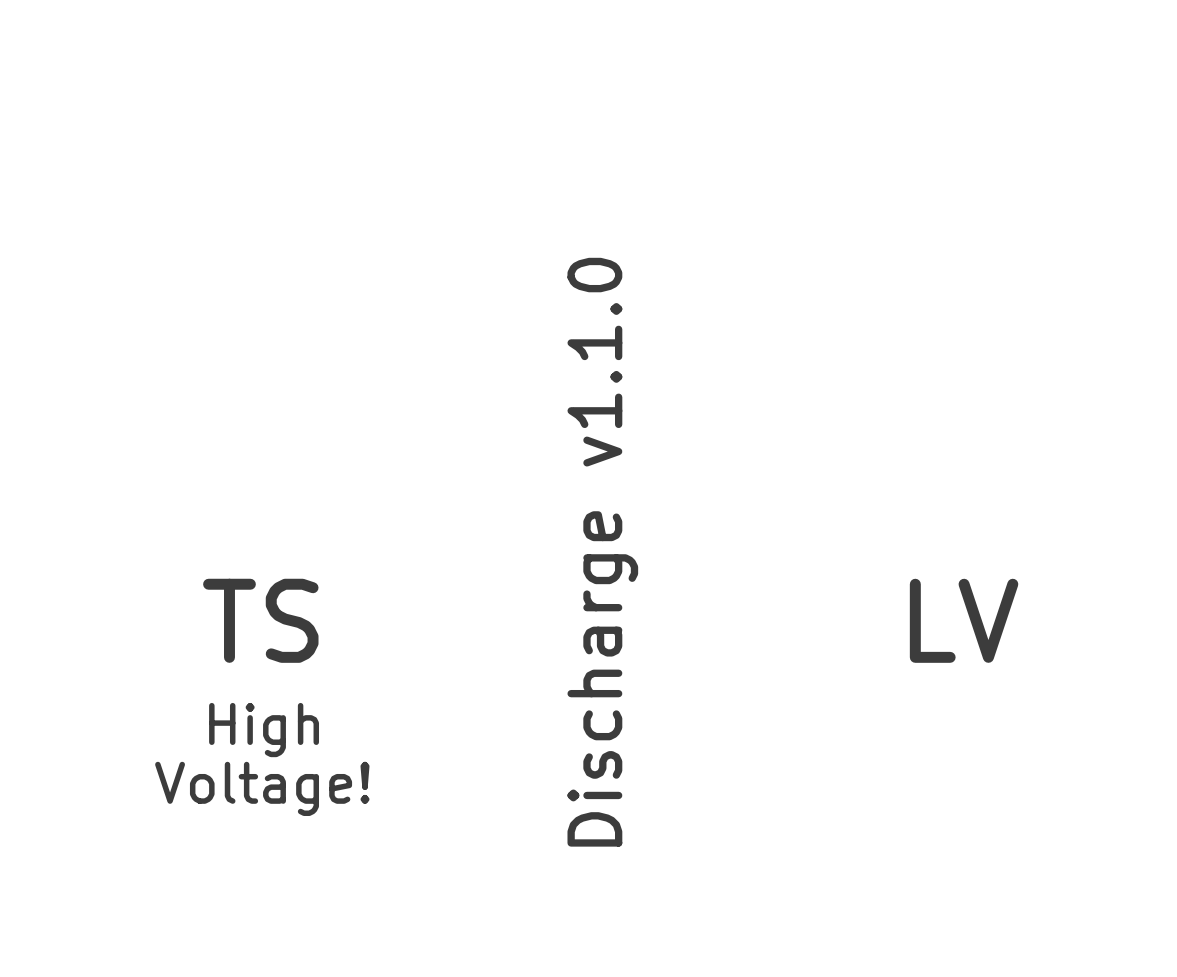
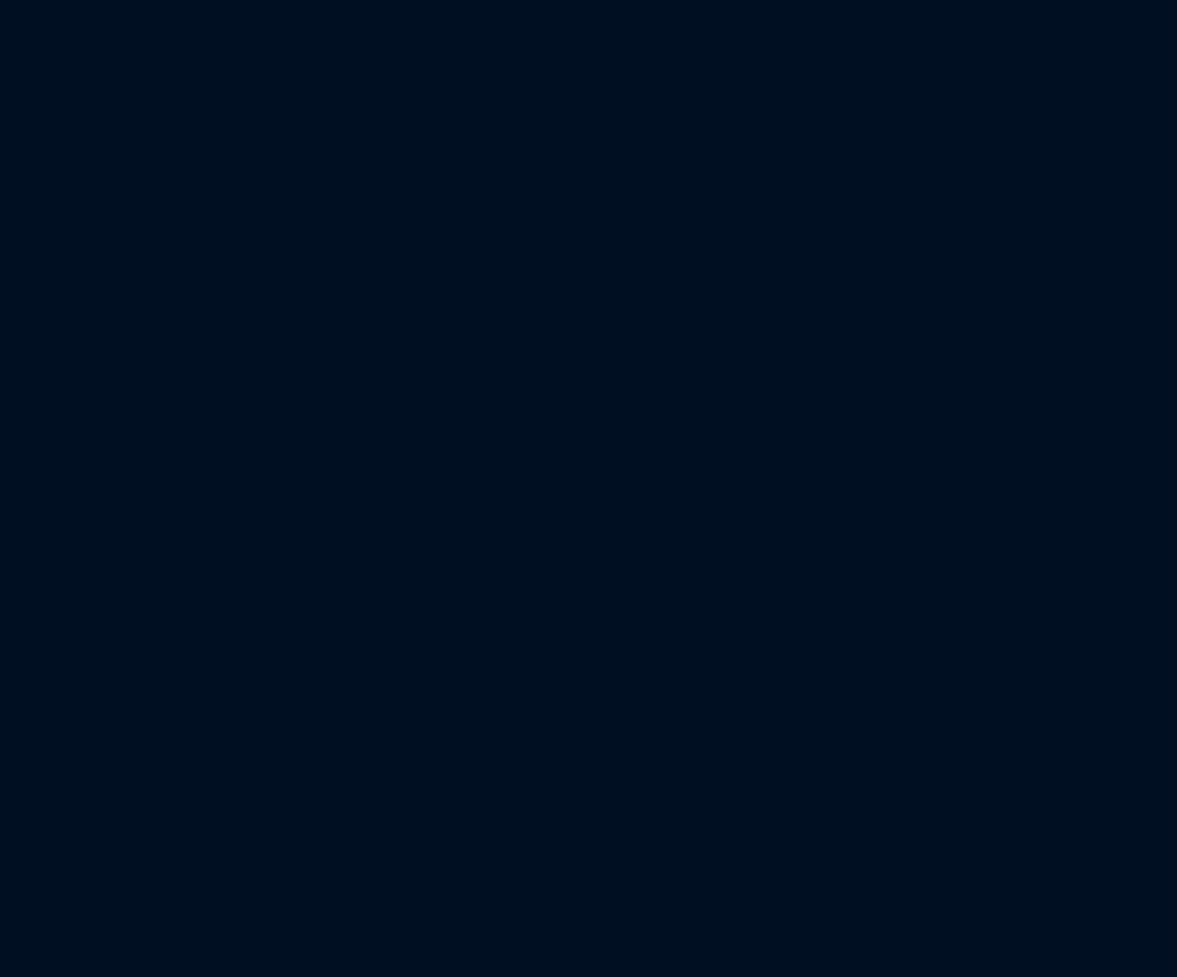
text: Discharge v1.1.0 (602, 552) -> none
text: TS (260, 620) -> none
text: LV (964, 620) -> none
text: High (264, 730) -> none
text: Voltage! (262, 788) -> none

